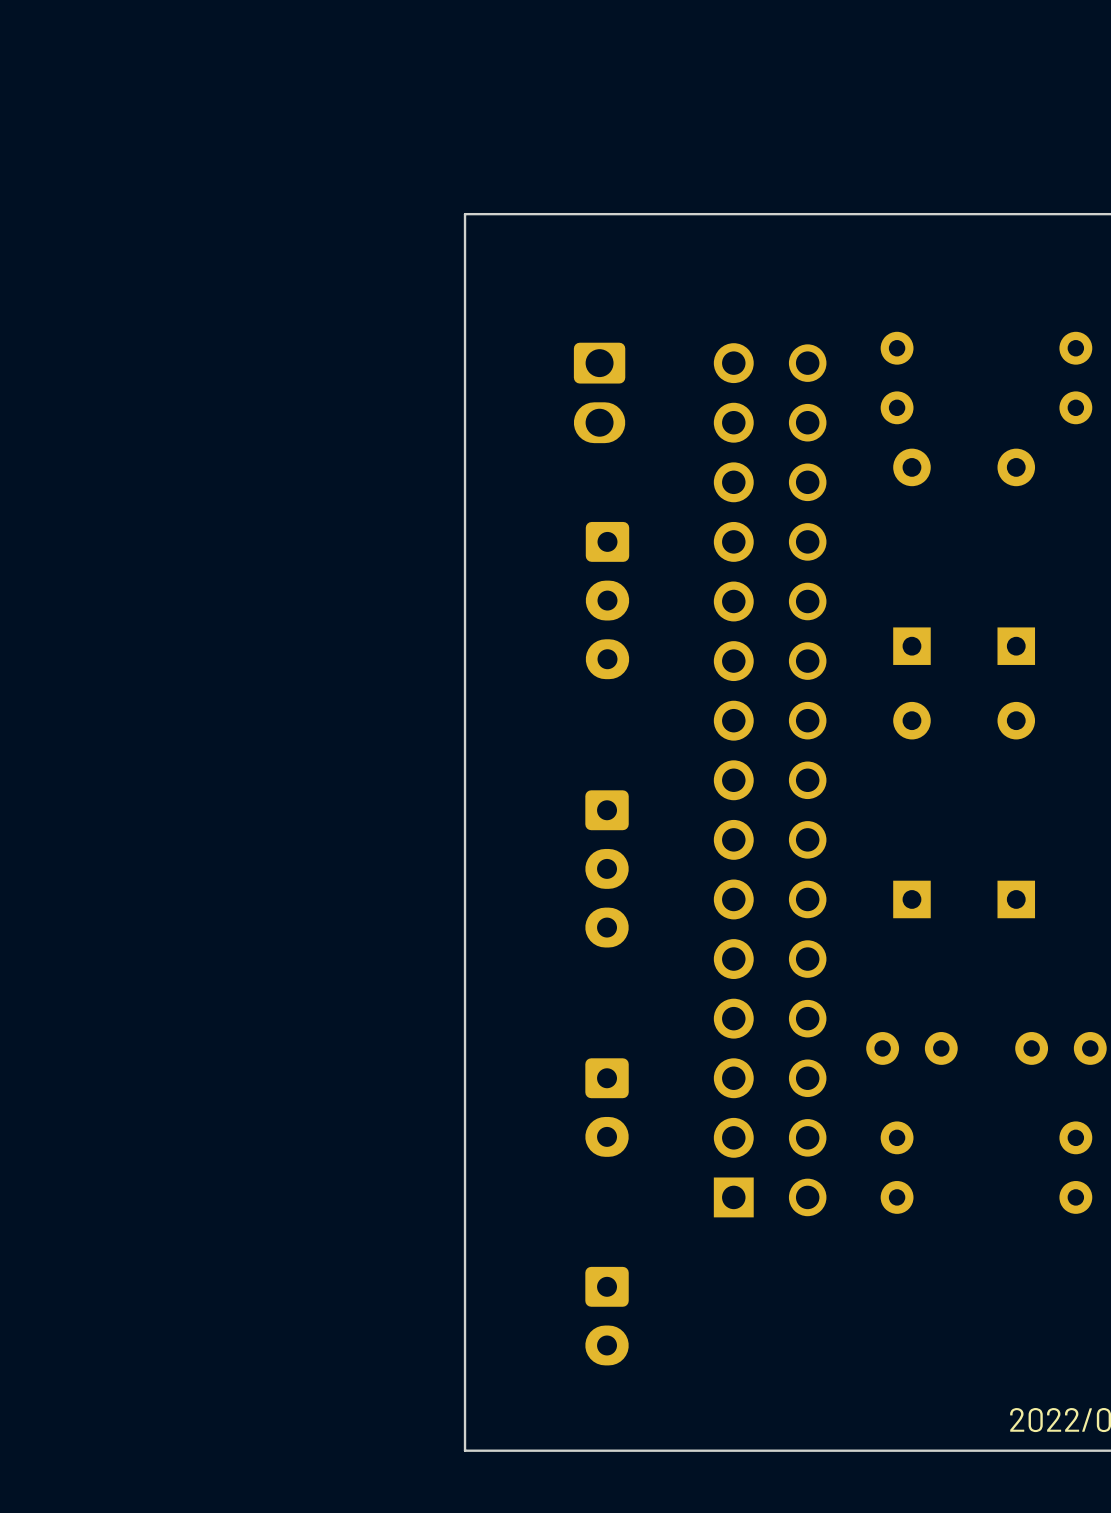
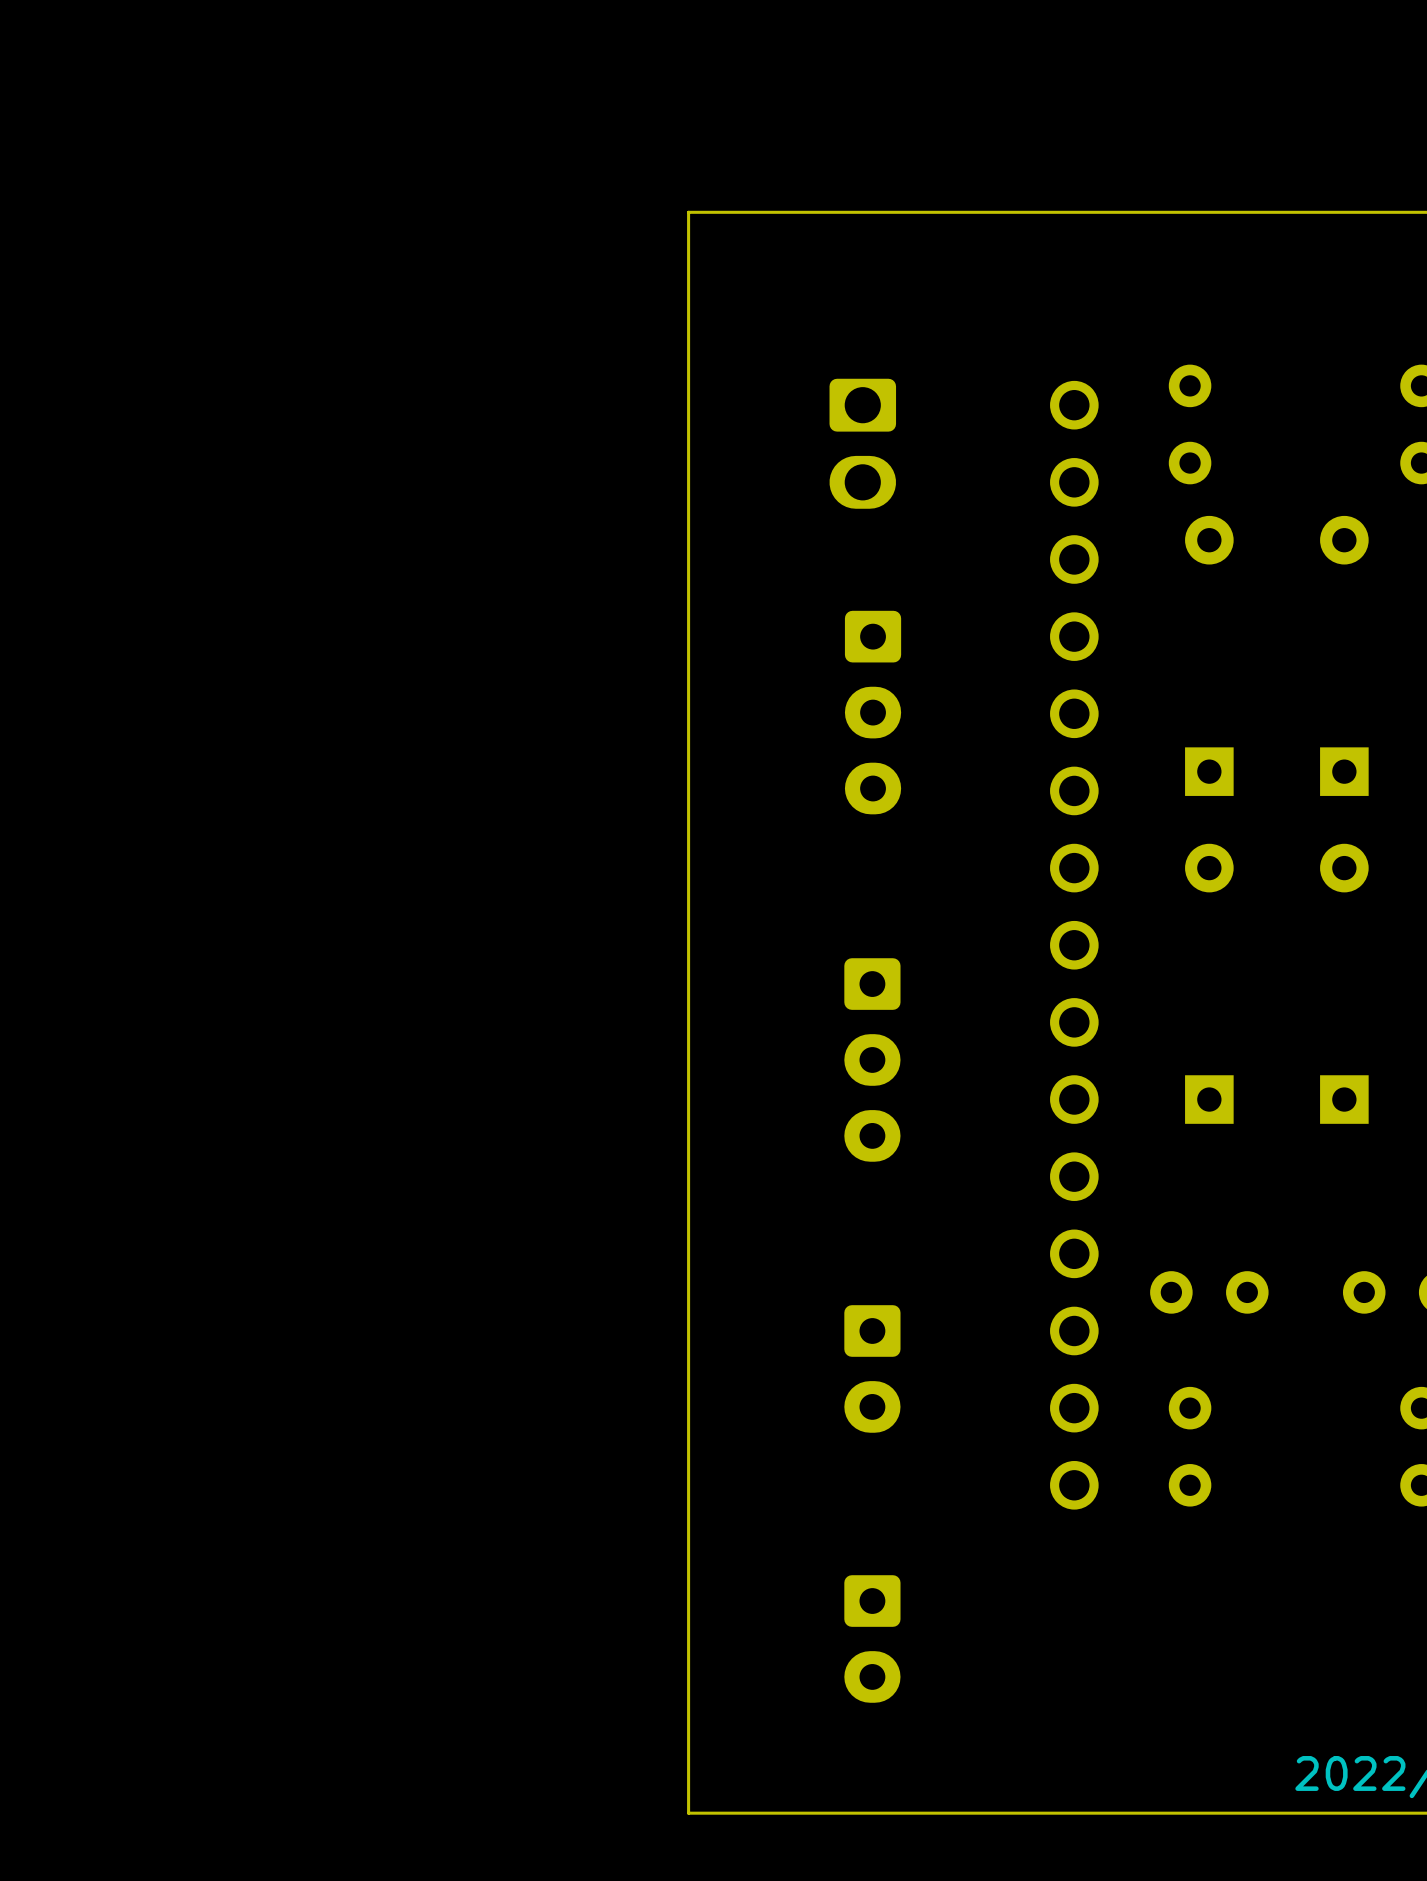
board edge: (509, 214) (465, 214) (465, 1450) (509, 1450) -> (688, 212) (688, 1813)
part position: (599, 392) -> (862, 443)
part position: (607, 600) -> (873, 712)
part: (733, 780) -> none
part position: (607, 868) -> (872, 1059)
part position: (607, 1107) -> (872, 1368)
part position: (607, 1316) -> (872, 1638)

